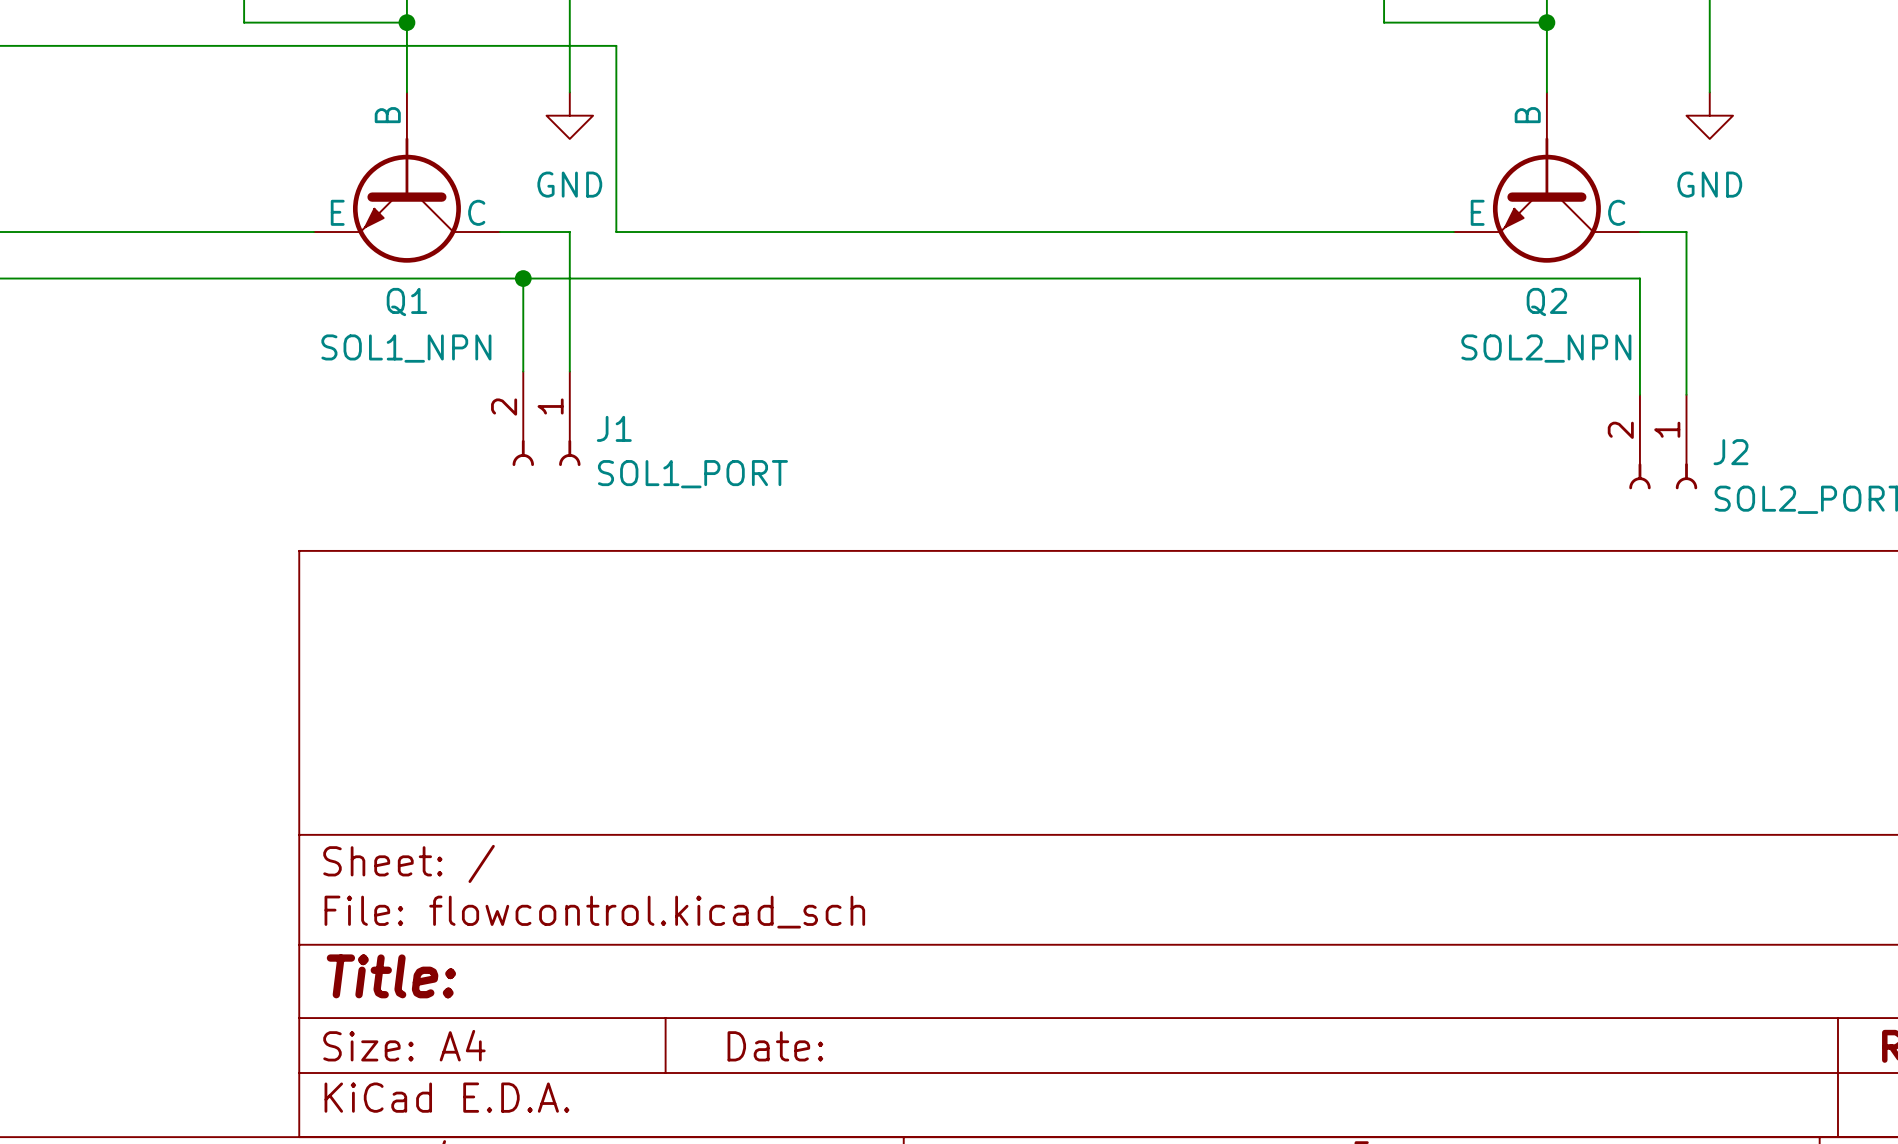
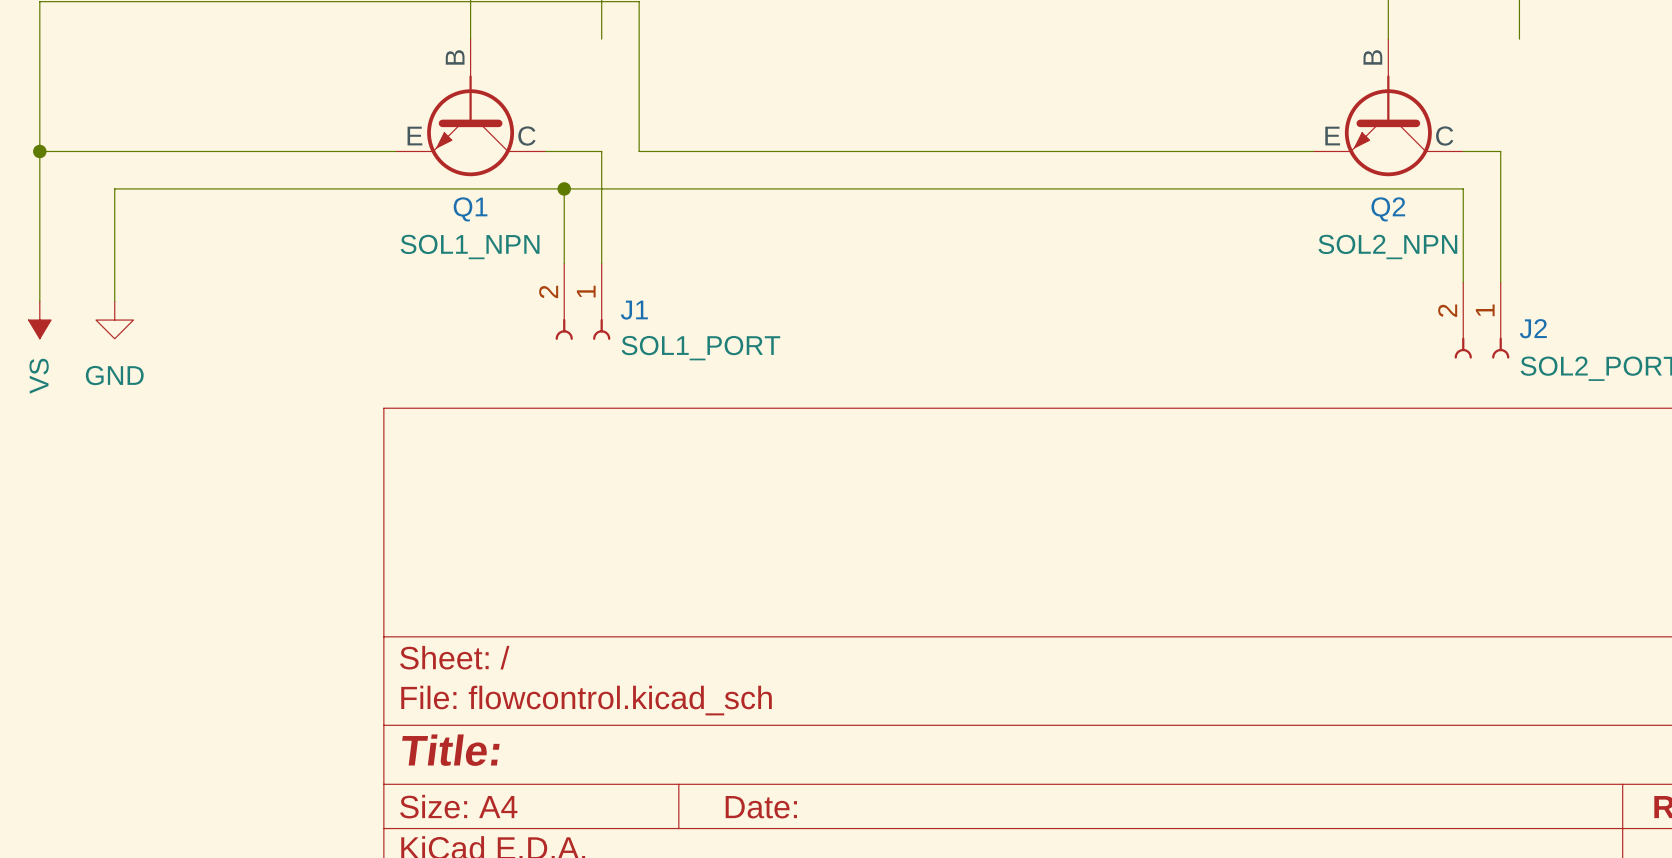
power symbol: GND (569, 115) -> none
power symbol: GND (1709, 115) -> none

